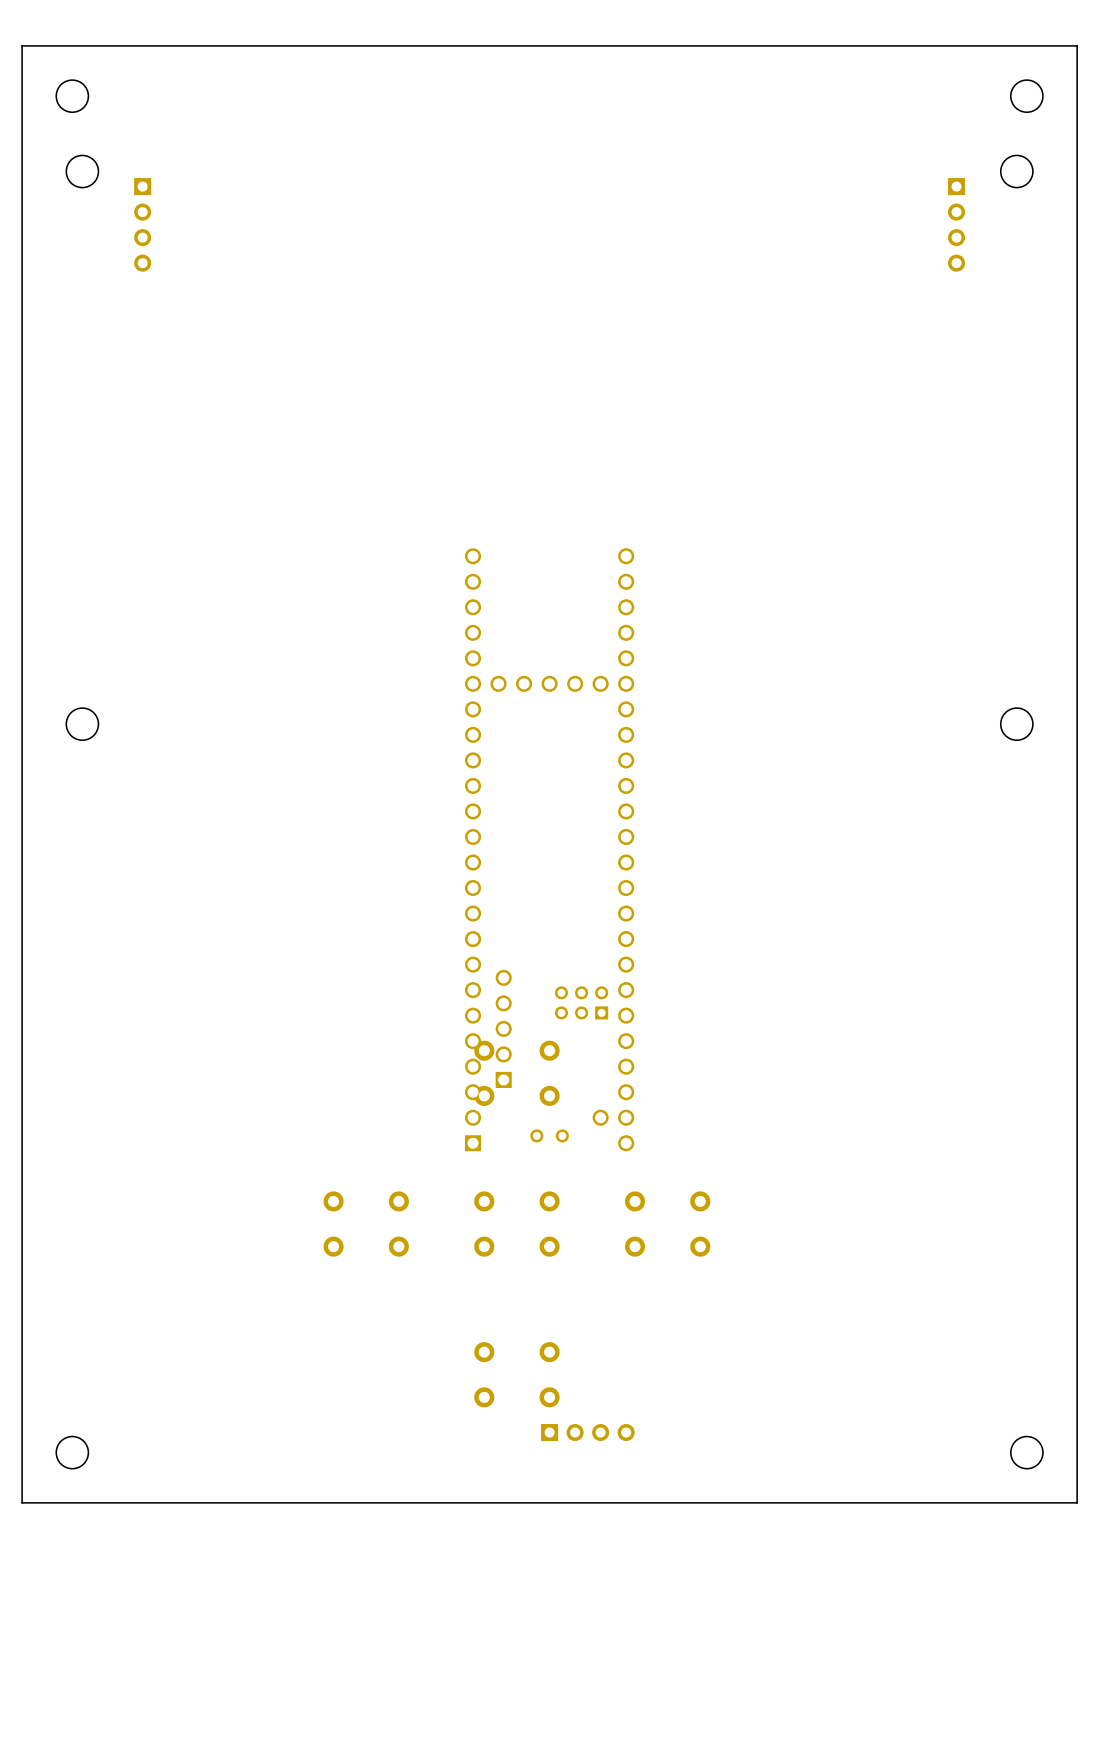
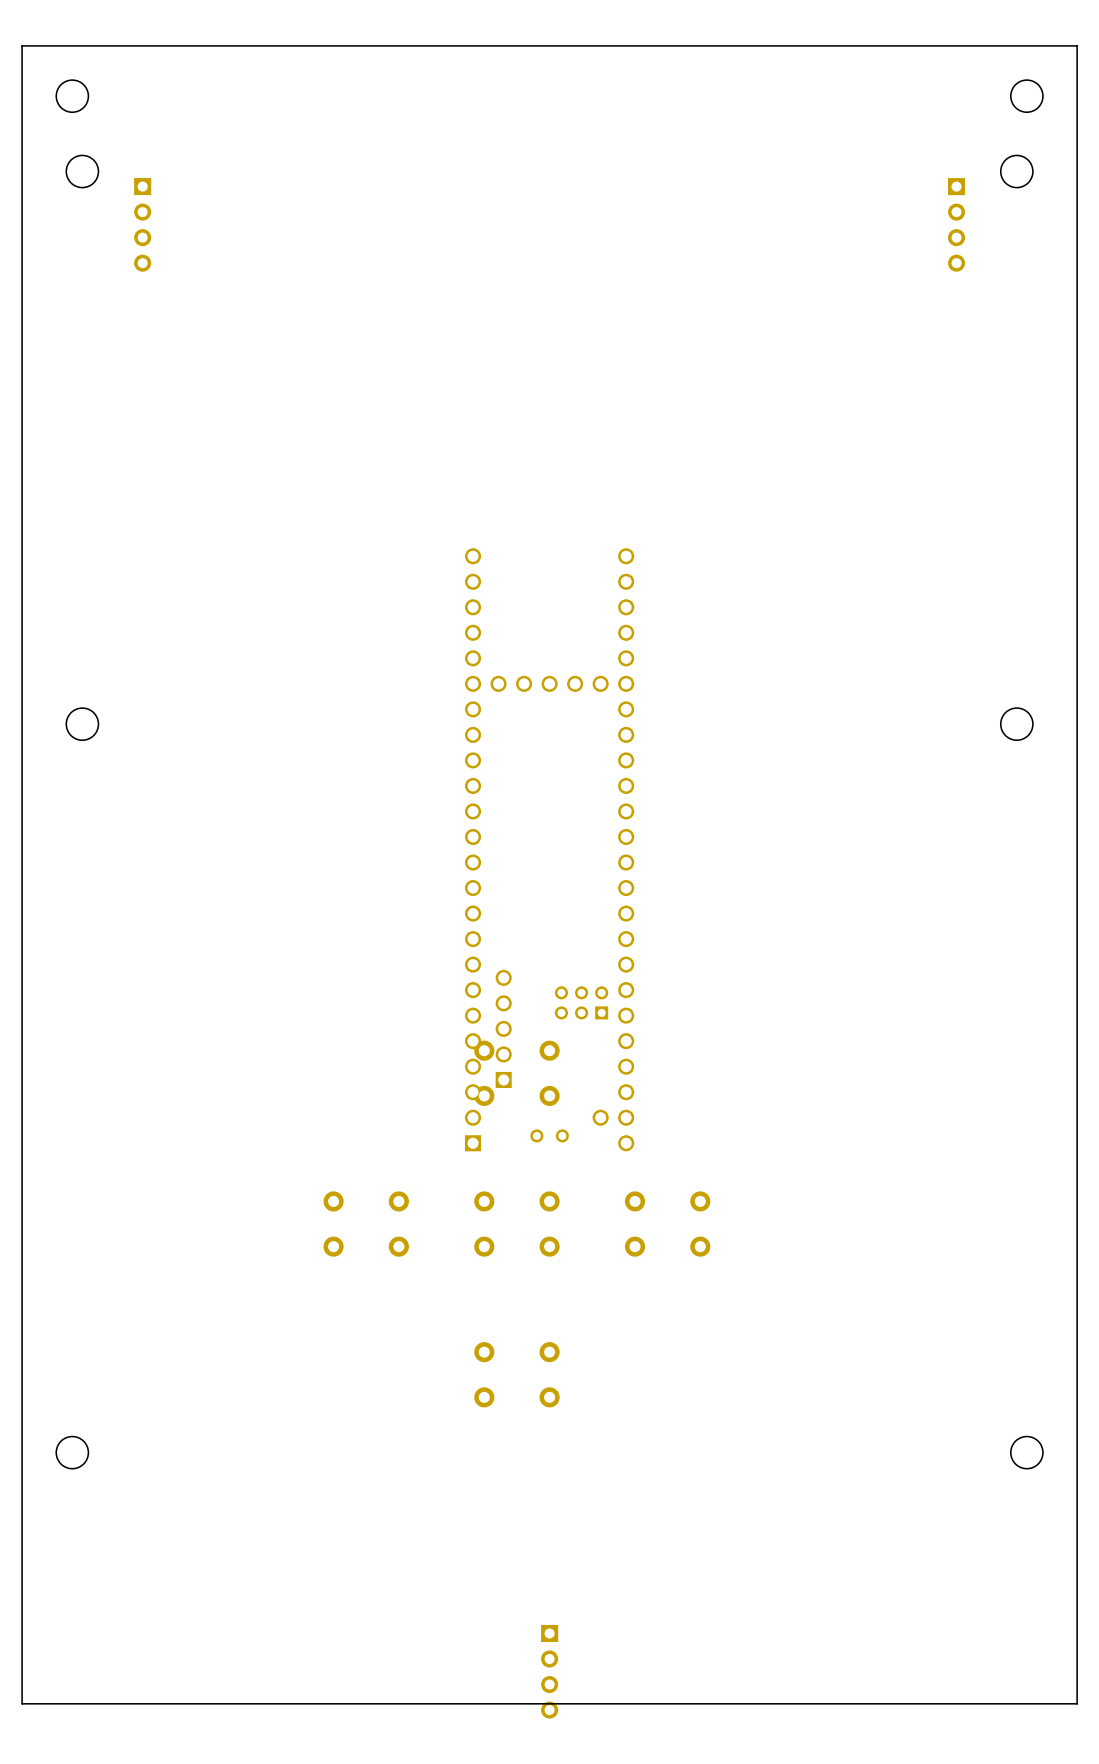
part rotation: 0° (587, 1432) -> 90° clockwise (549, 1671)
part position: (587, 1432) -> (549, 1671)
board edge: (1077, 1502) (22, 1502) -> (1077, 1502) (1077, 1703) (22, 1703) (22, 1502)

